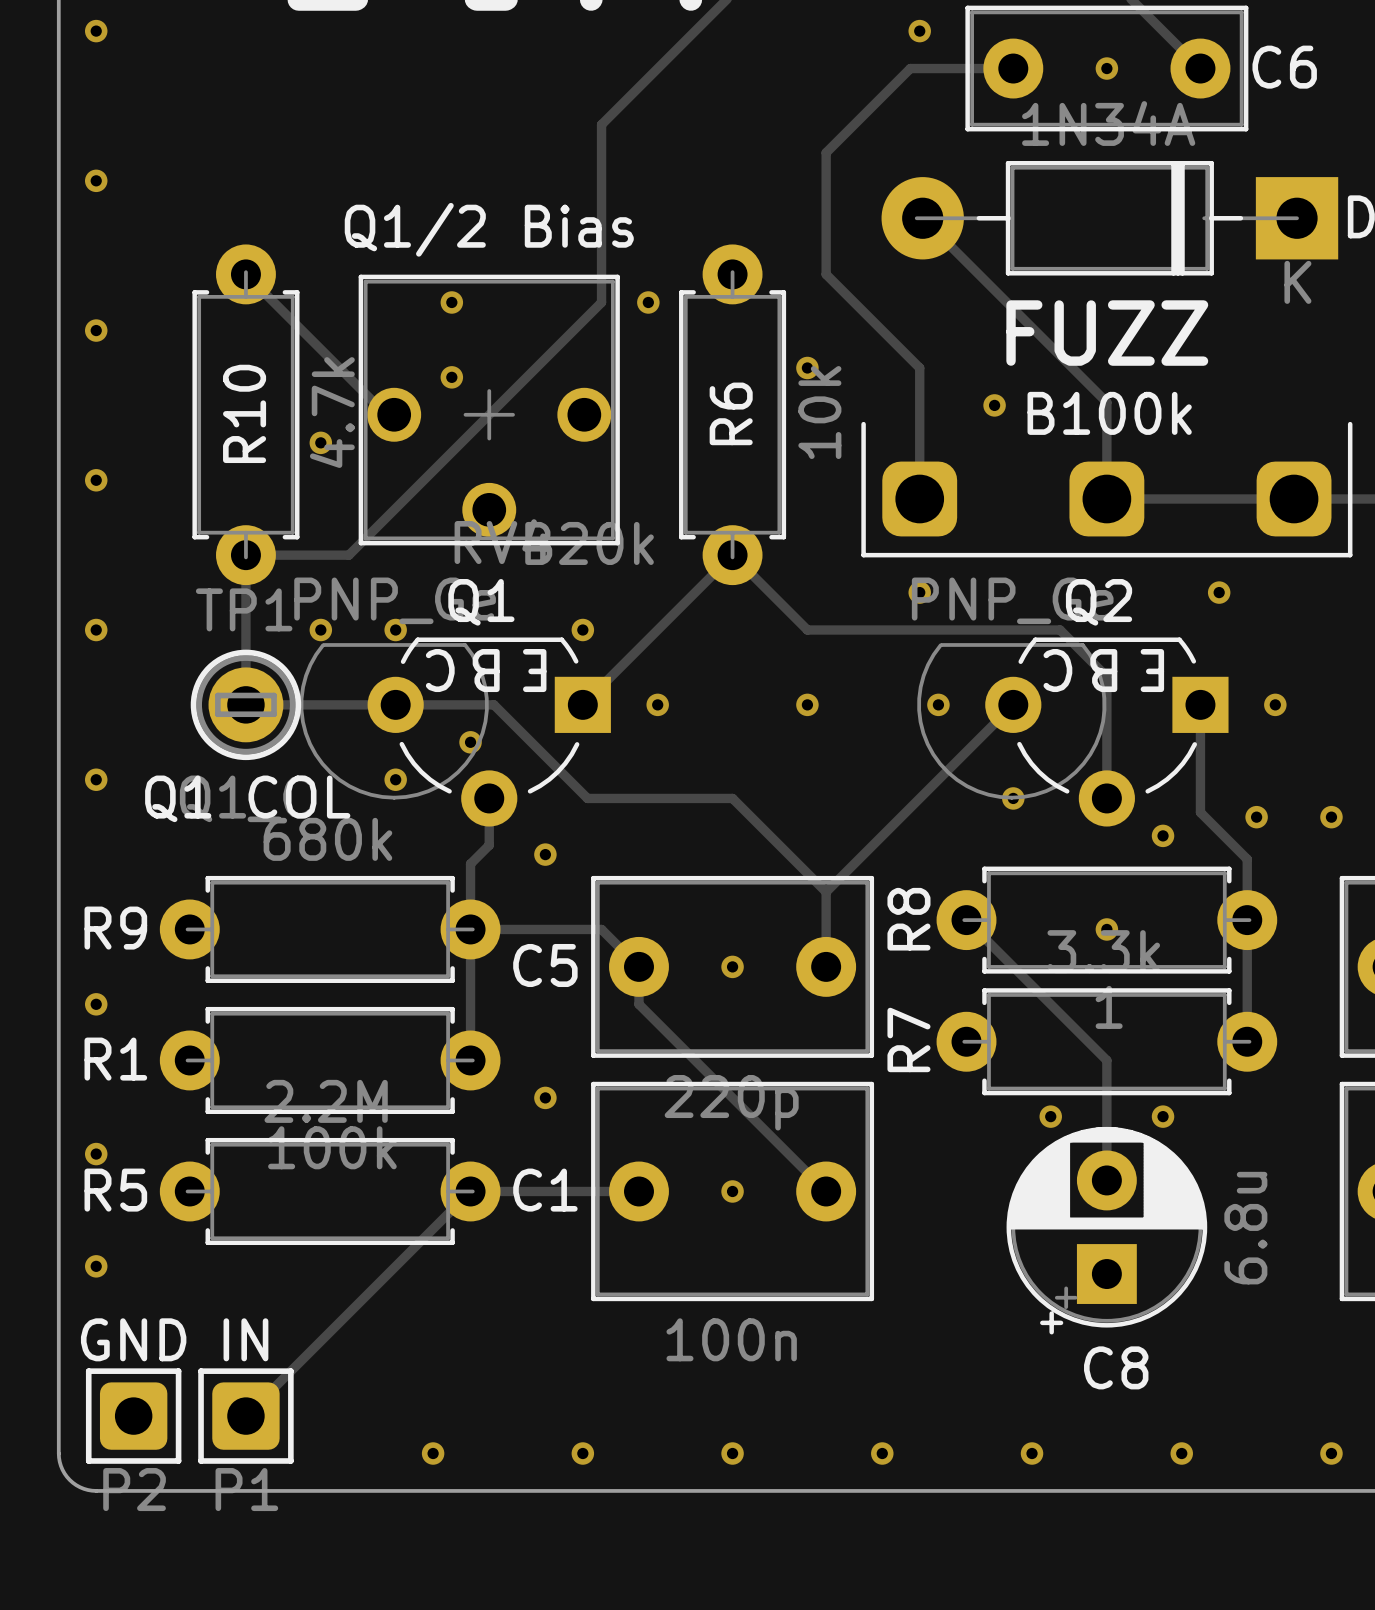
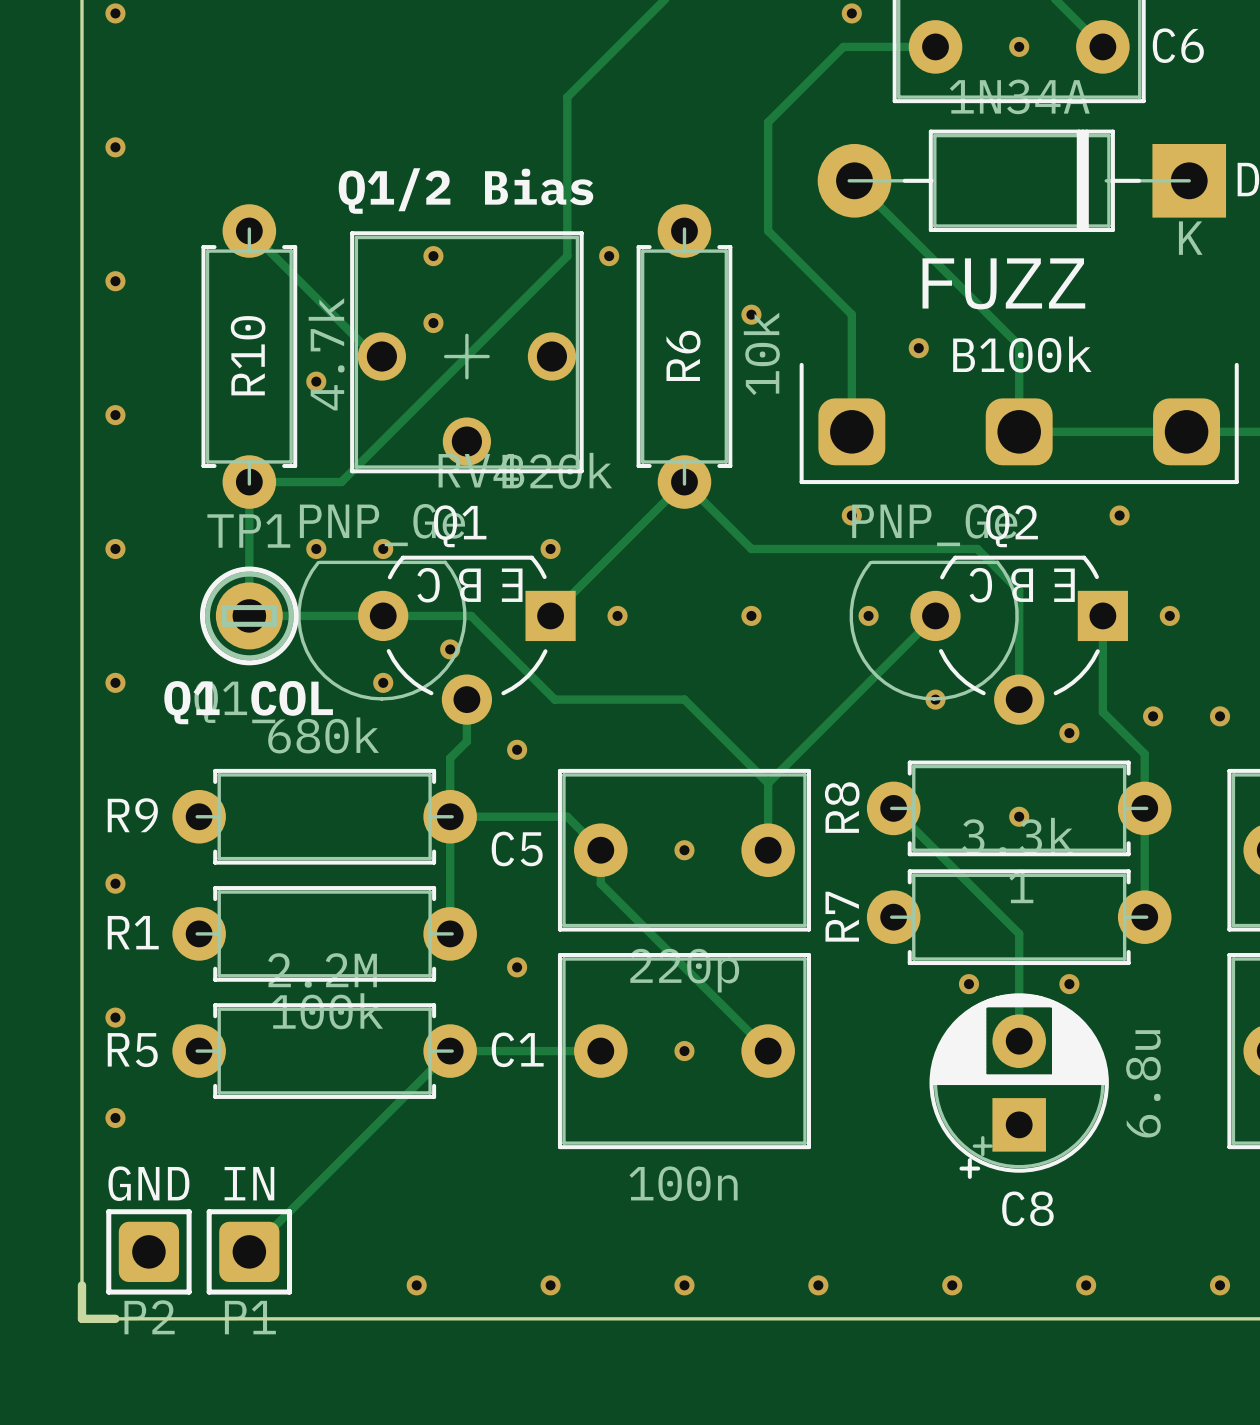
board edge: (58, 1453) (60, 1465) (69, 1479) (83, 1488) (96, 1490) -> (81, 1285) (81, 1318) (115, 1318)

